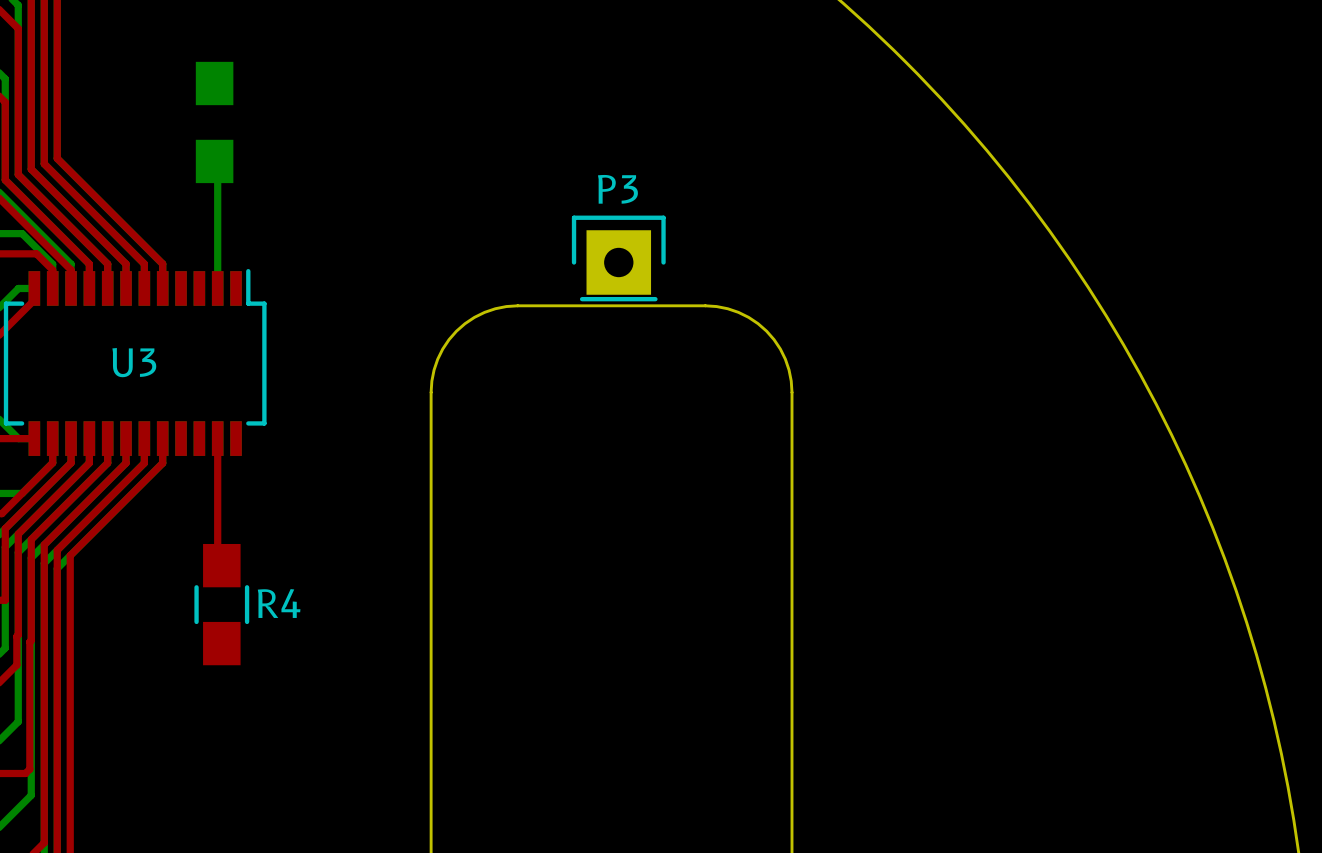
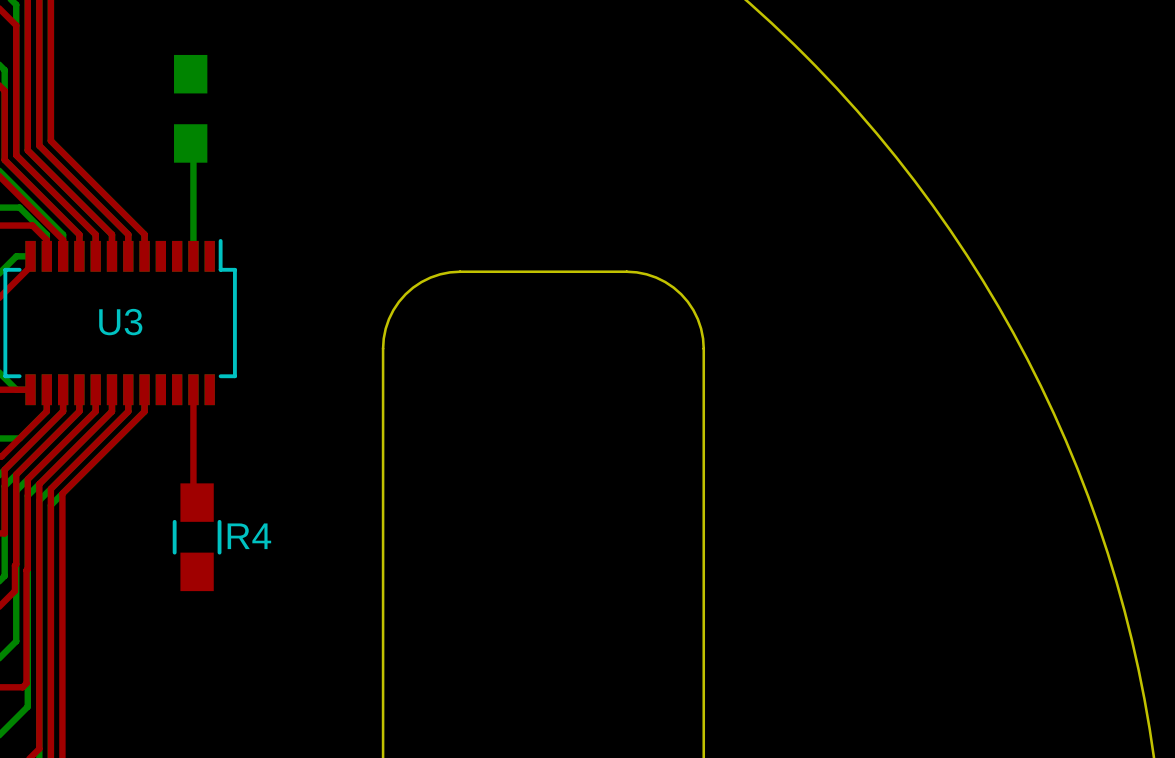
P3: (618, 258) -> none

